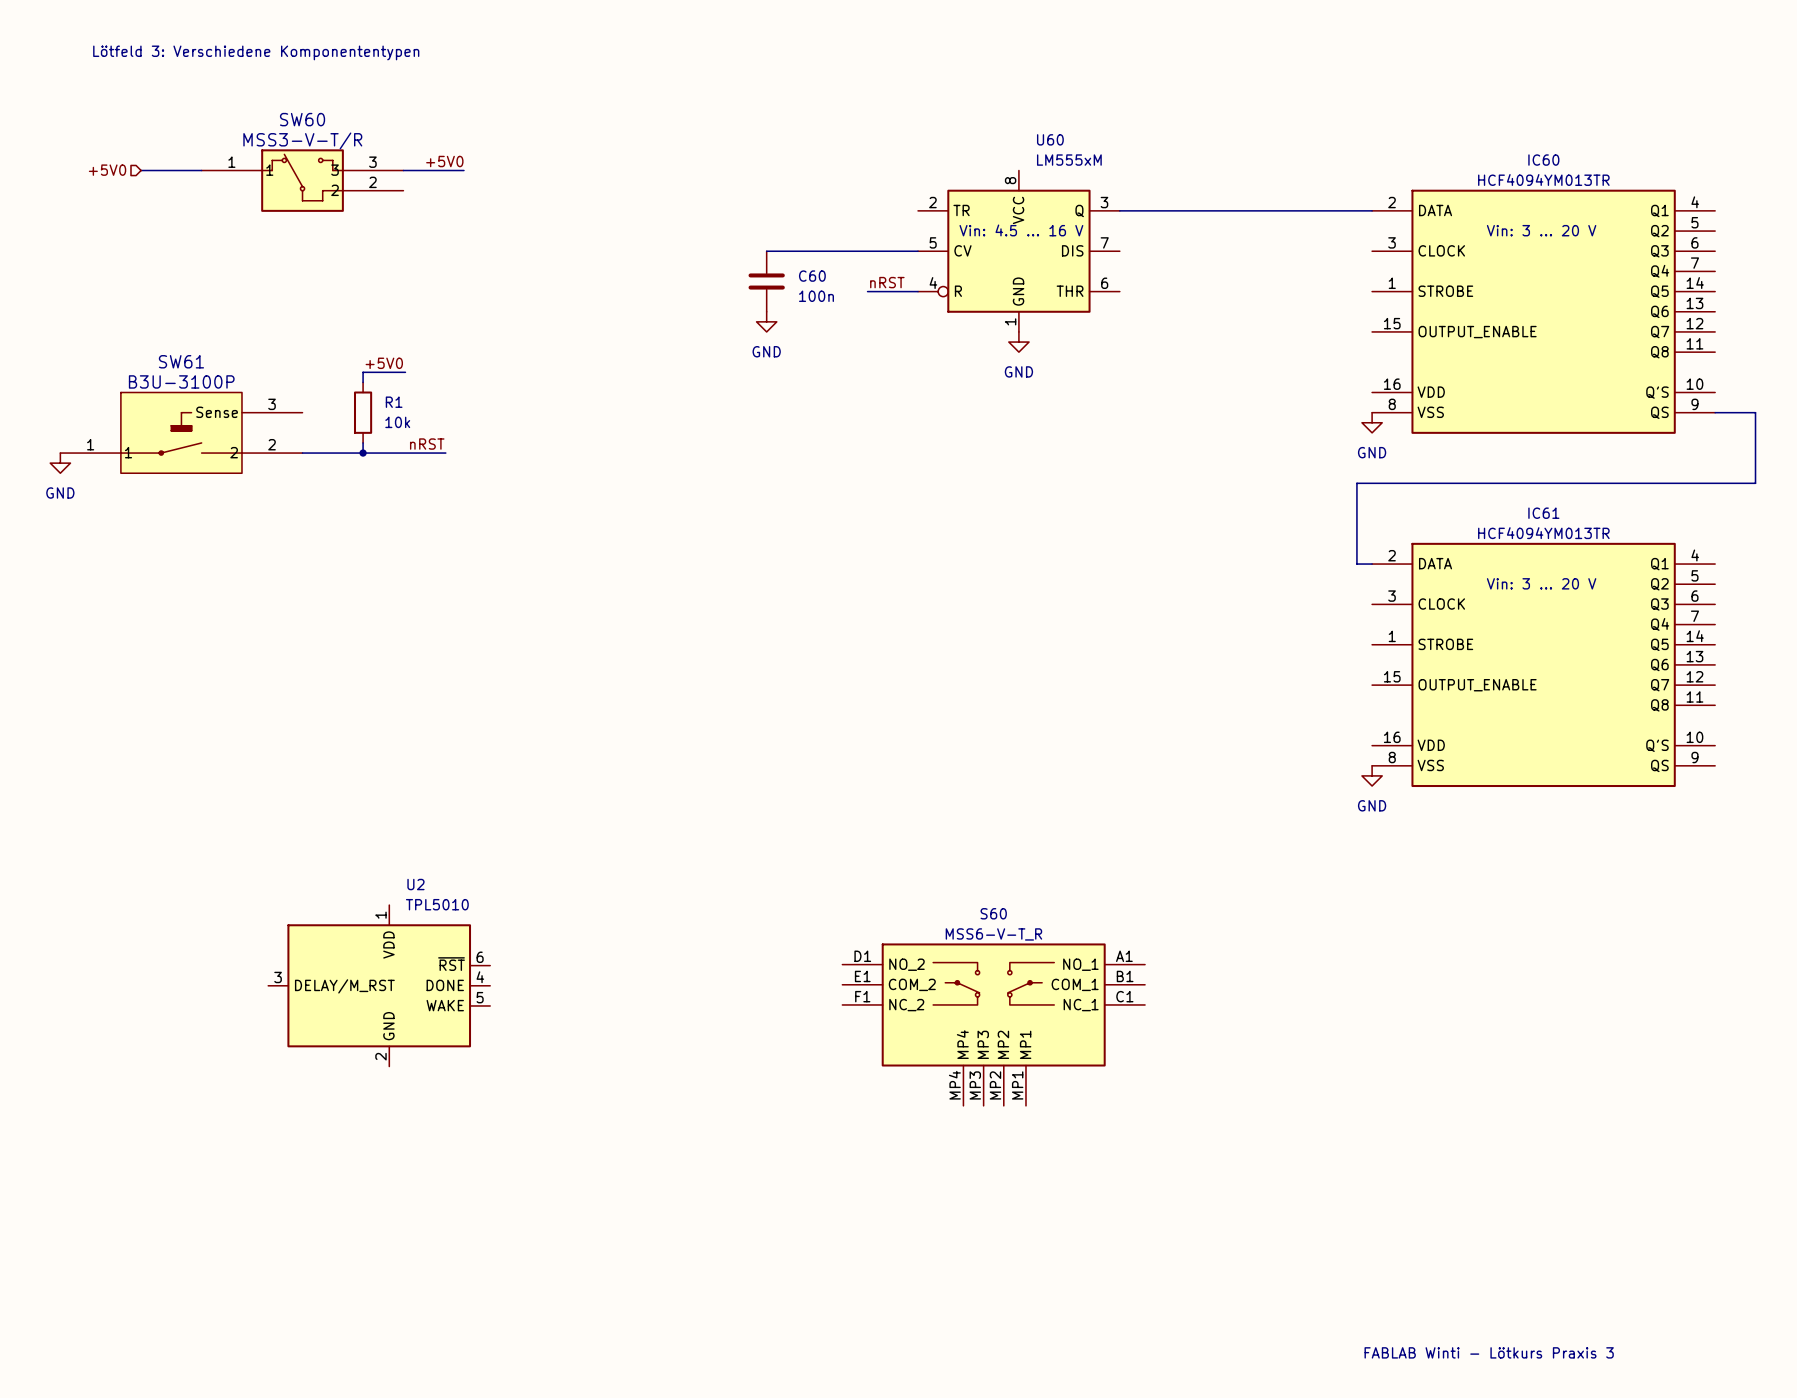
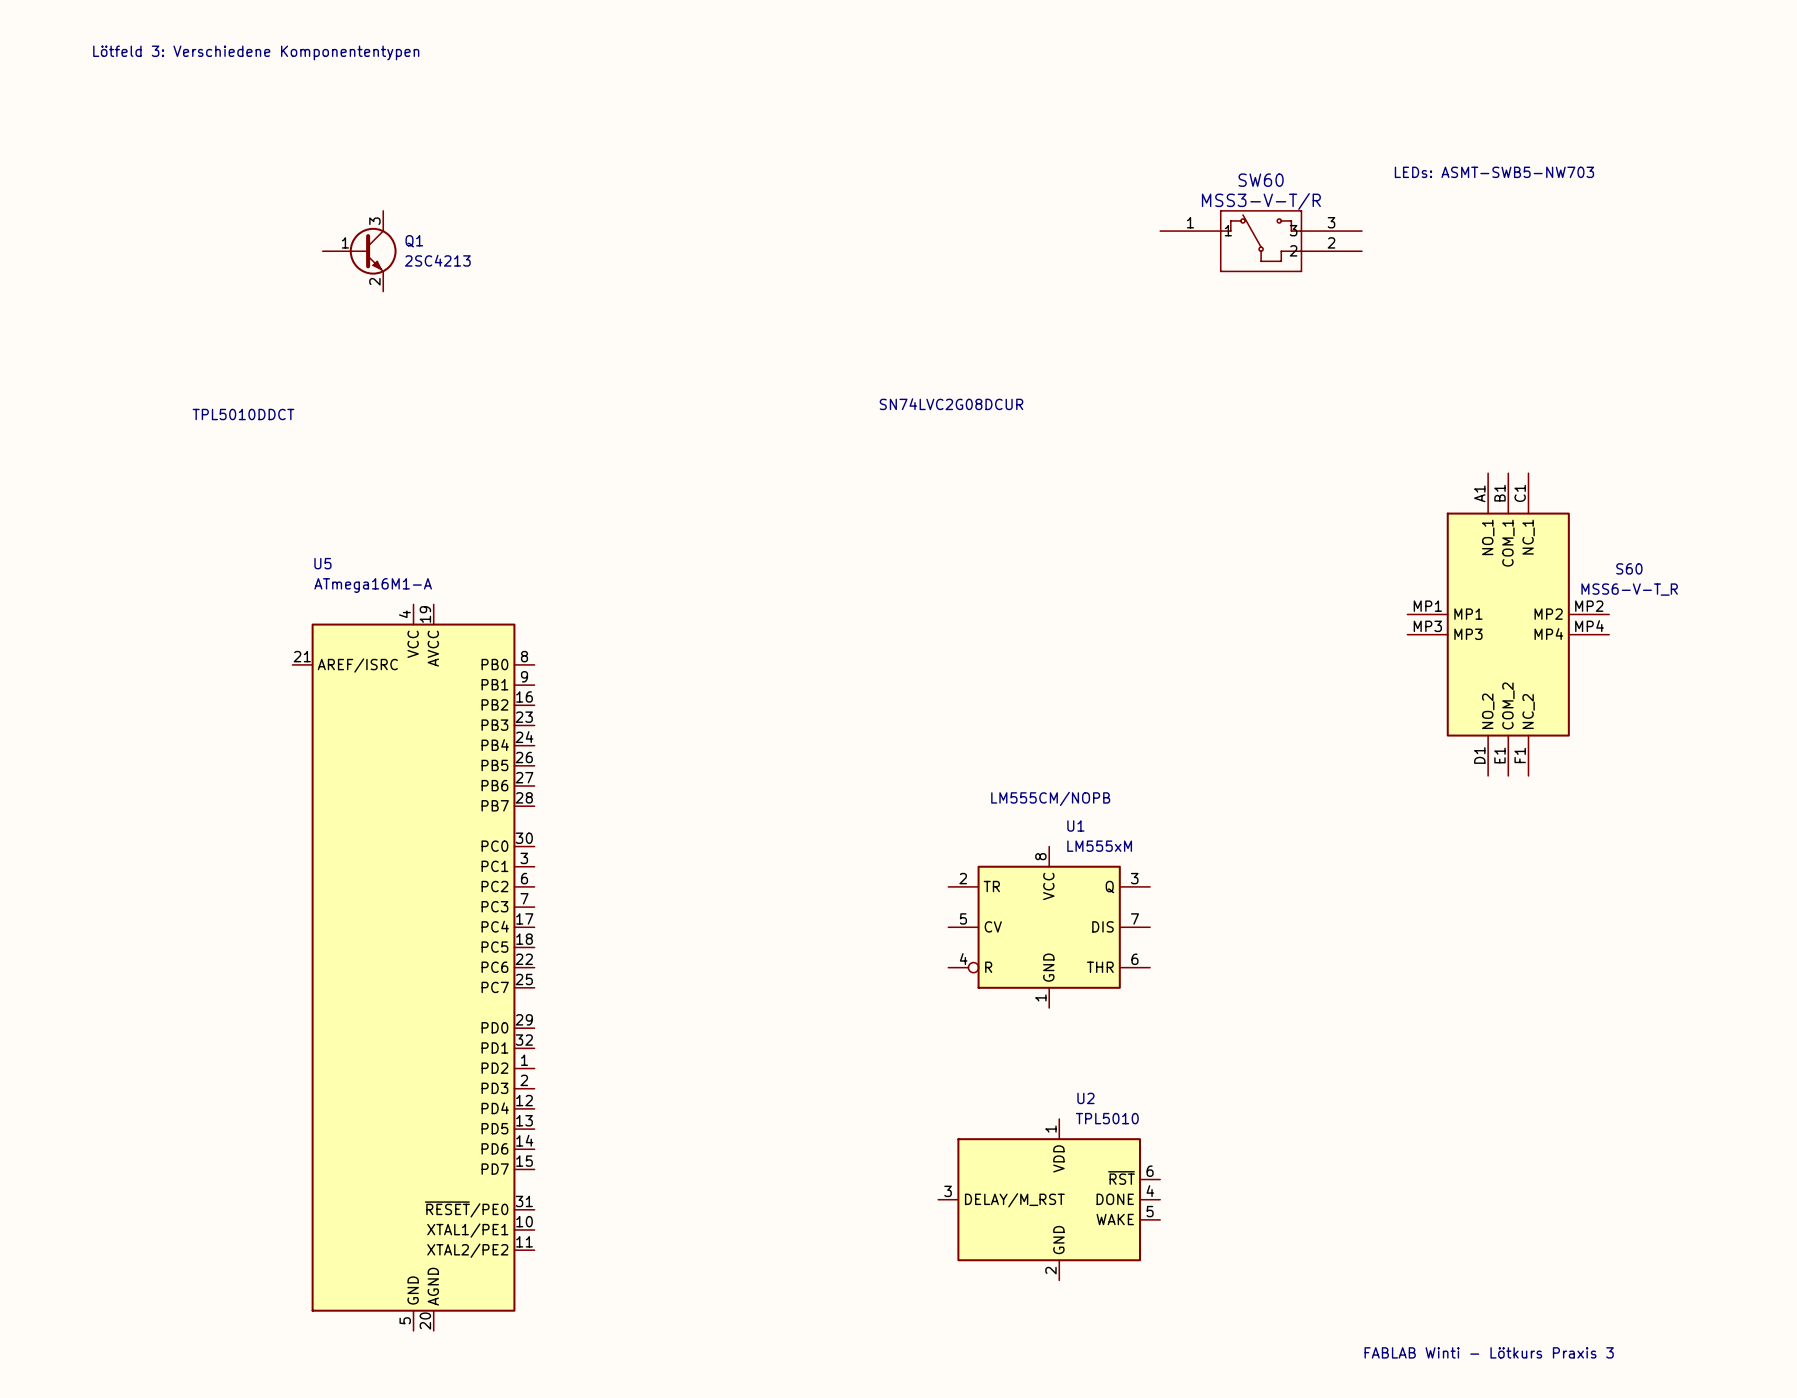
SW60 symbol: [201, 149, 404, 212] -> [1160, 210, 1362, 272]
label: +5V0 (444, 161) -> none
hierarchical label: +5V0 (107, 170) -> none
wire: (141, 170) (201, 170) -> none
wire: (403, 170) (463, 170) -> none
text: none -> LEDs: ASMT-SWB5-NW703 (1494, 172)
wire: (1119, 210) (1372, 210) -> none
Q1: none -> 2SC4213 (359, 251)
wire: (766, 251) (918, 251) -> none
U60: LM555xM (1018, 251) -> none
C60: 100n (766, 281) -> none
label: nRST (887, 282) -> none
wire: (867, 291) (918, 291) -> none
IC60: HCF4094YM013TR (1543, 311) -> none
power symbol: GND (766, 321) -> none
power symbol: GND (1018, 342) -> none
label: +5V0 (384, 363) -> none
wire: (405, 372) (363, 372) (363, 382) -> none
text: none -> SN74LVC2G08DCUR (951, 404)
R1: 10k (363, 412) -> none
wire: (1715, 412) (1755, 412) (1755, 483) (1356, 483) (1356, 564) (1372, 564) -> none
text: none -> TPL5010DDCT (243, 414)
power symbol: GND (1372, 422) -> none
SW61: B3U-3100P (181, 432) -> none
wire: (363, 442) (363, 453) -> none
label: nRST (427, 444) -> none
wire: (302, 453) (445, 453) -> none
junction: (363, 453) -> none
power symbol: GND (60, 463) -> none
IC61: HCF4094YM013TR (1543, 664) -> none
power symbol: GND (1372, 775) -> none
text: none -> LM555CM/NOPB (1050, 798)
S60 name position: S60 (993, 913) -> S60 (1629, 568)
U1: none -> LM555xM (1049, 927)
S60 value position: MSS6-V-T_R (993, 934) -> MSS6-V-T_R (1629, 589)
S60 symbol: [842, 943, 1146, 1106] -> [1407, 473, 1610, 776]
U5: none -> ATmega16M1-A (413, 967)
U2 position: (379, 985) -> (1049, 1199)

